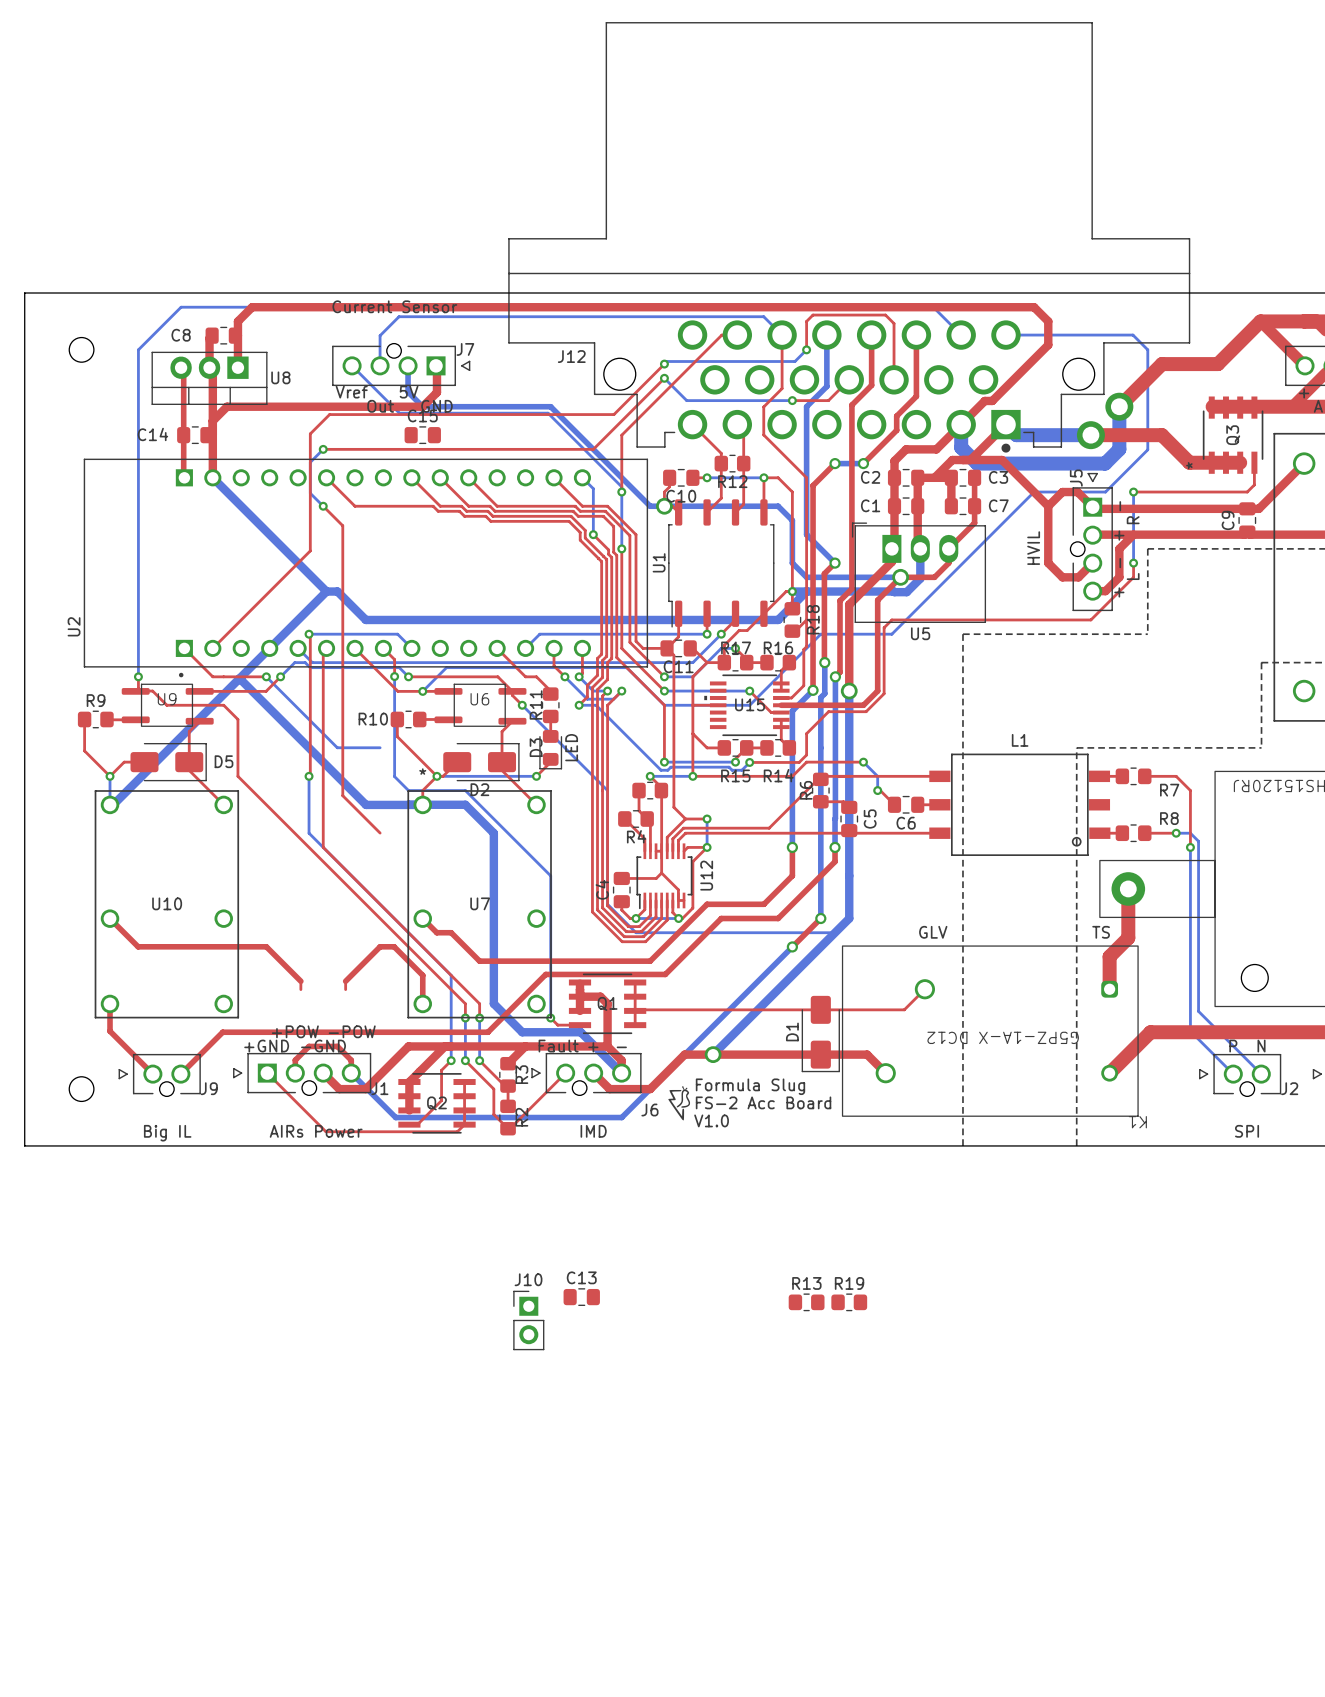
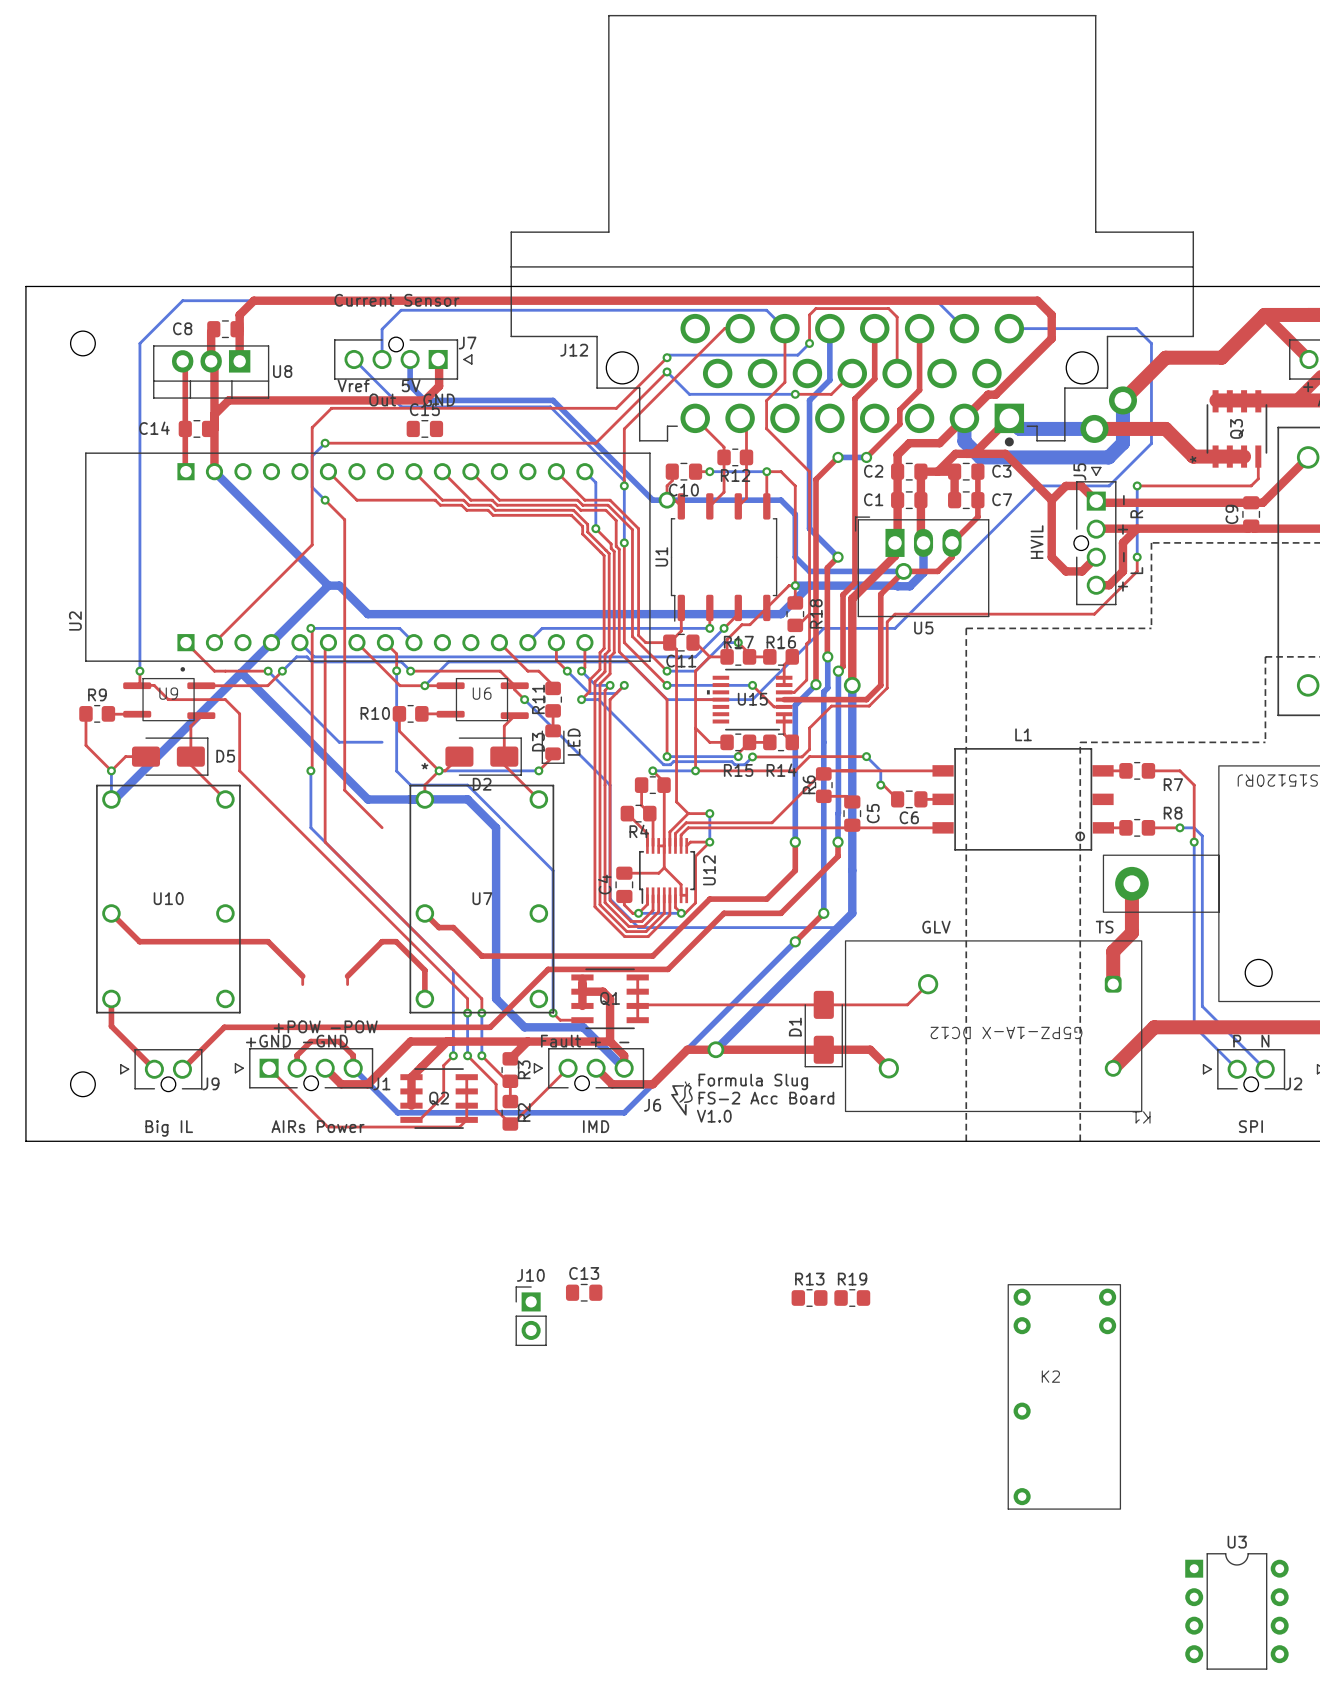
K2: none -> (1064, 1396)
U3: none -> (1236, 1611)

